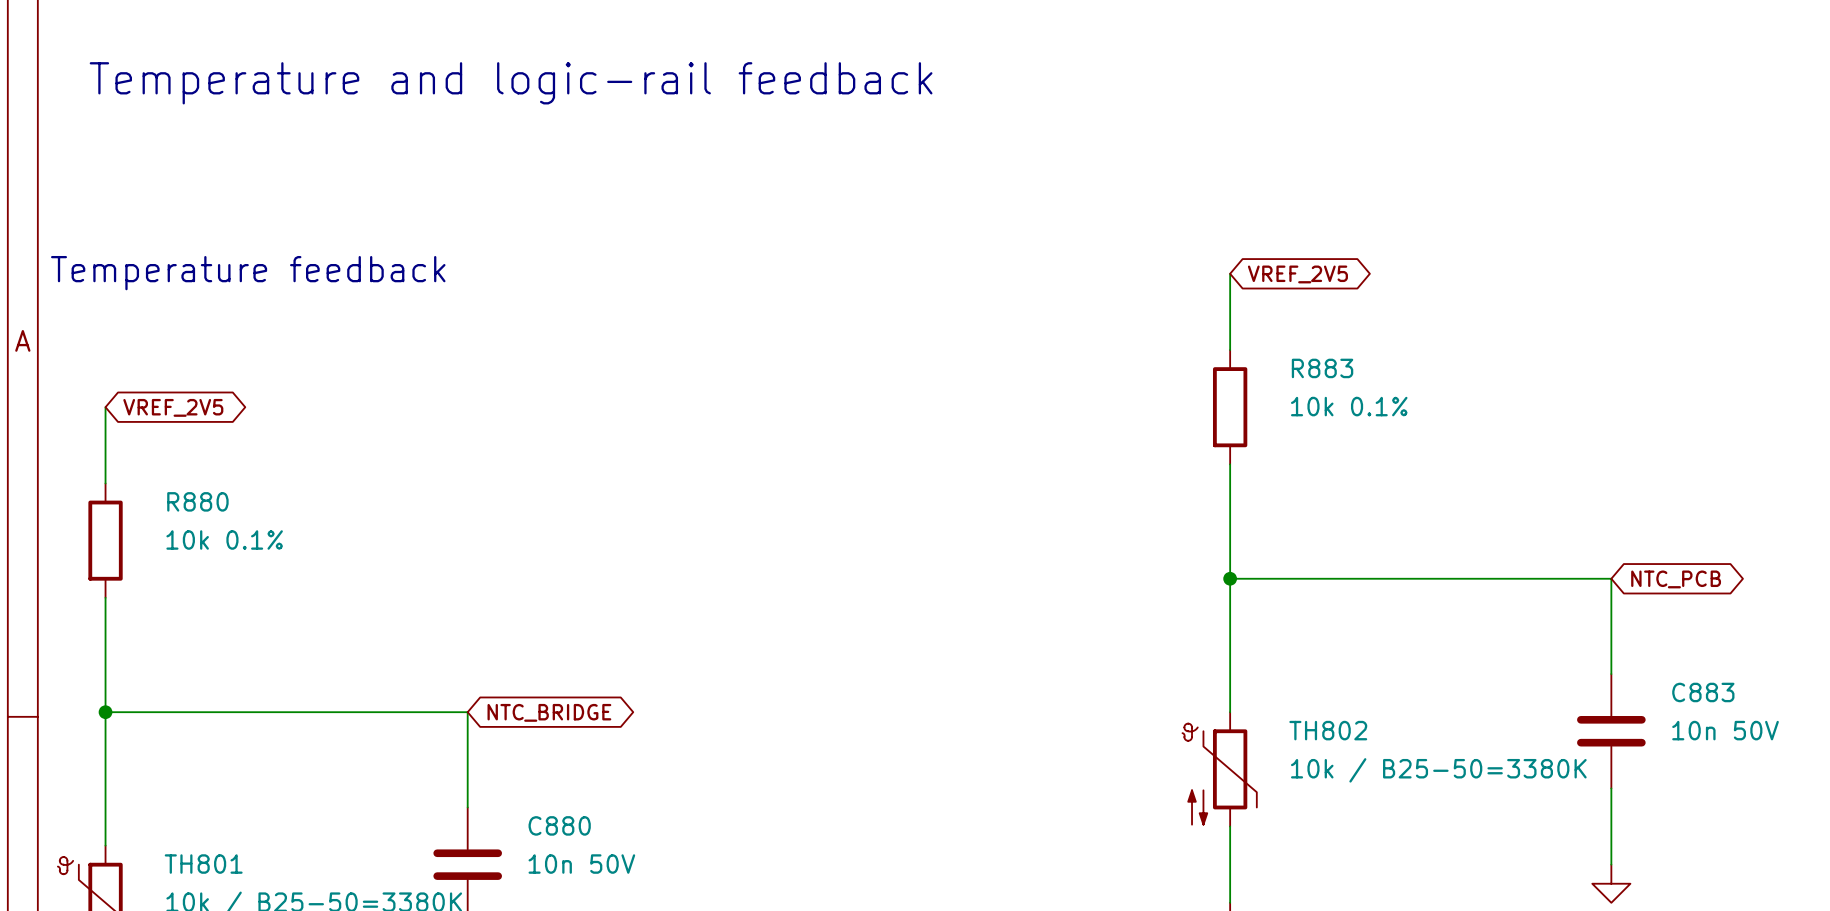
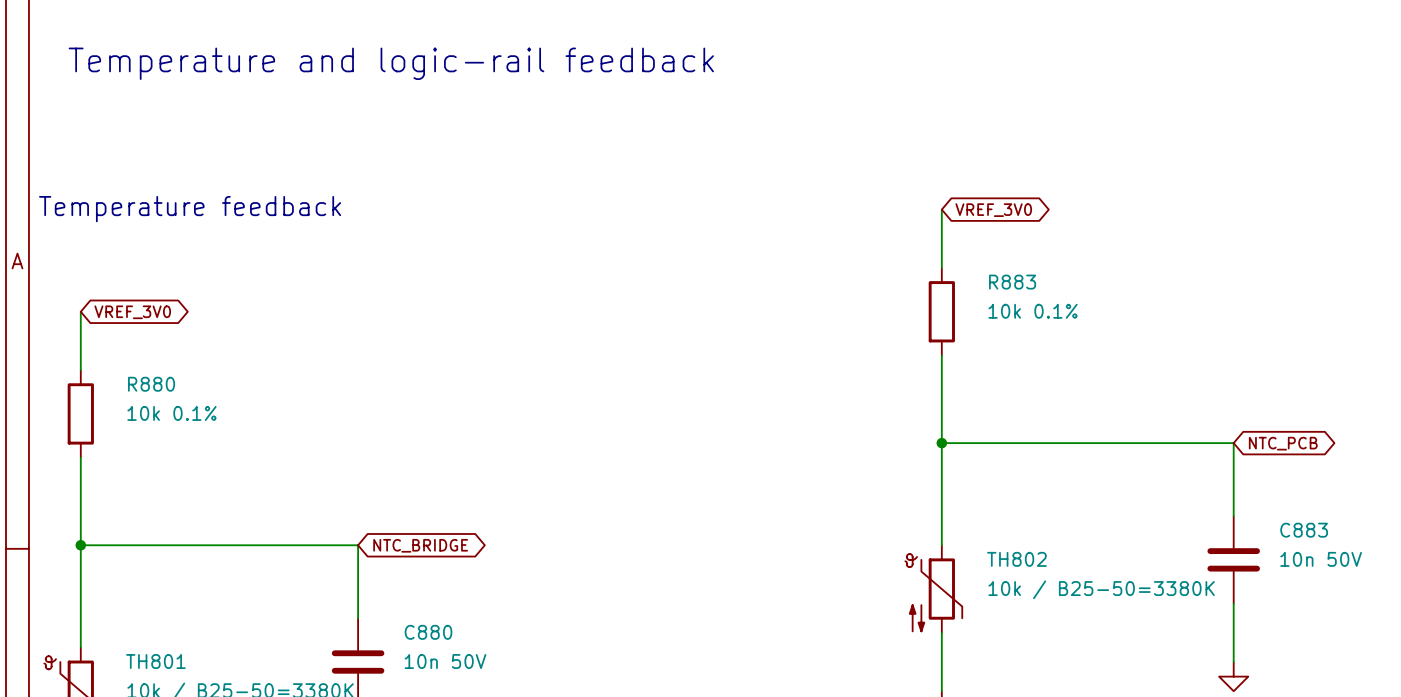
global label: VREF_2V5 (1297, 274) -> VREF_3V0 (993, 210)
global label: VREF_2V5 (173, 407) -> VREF_3V0 (132, 312)

